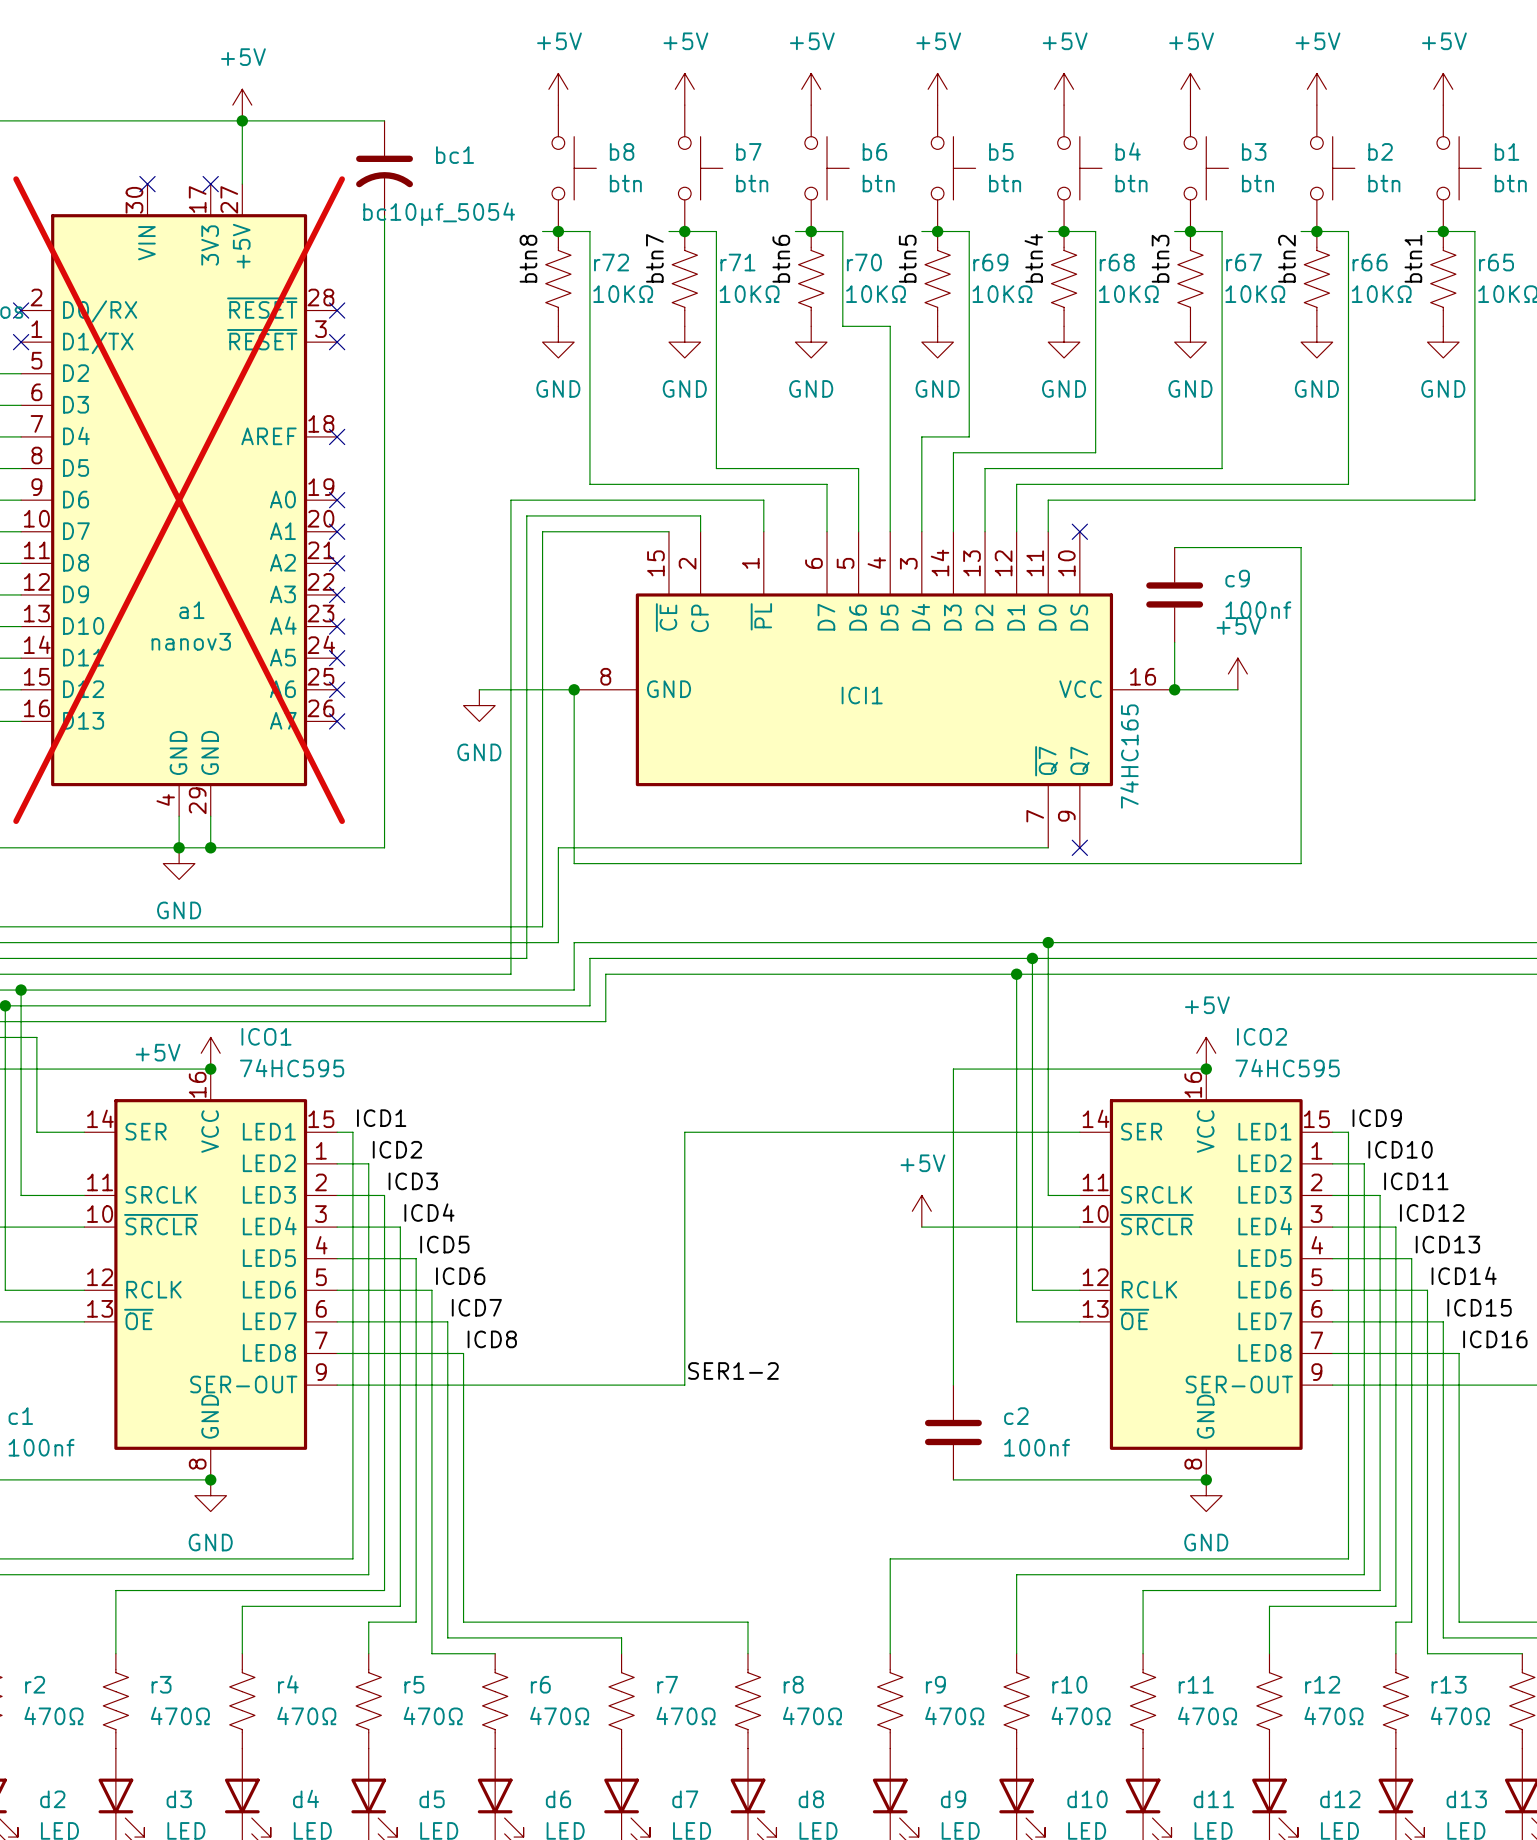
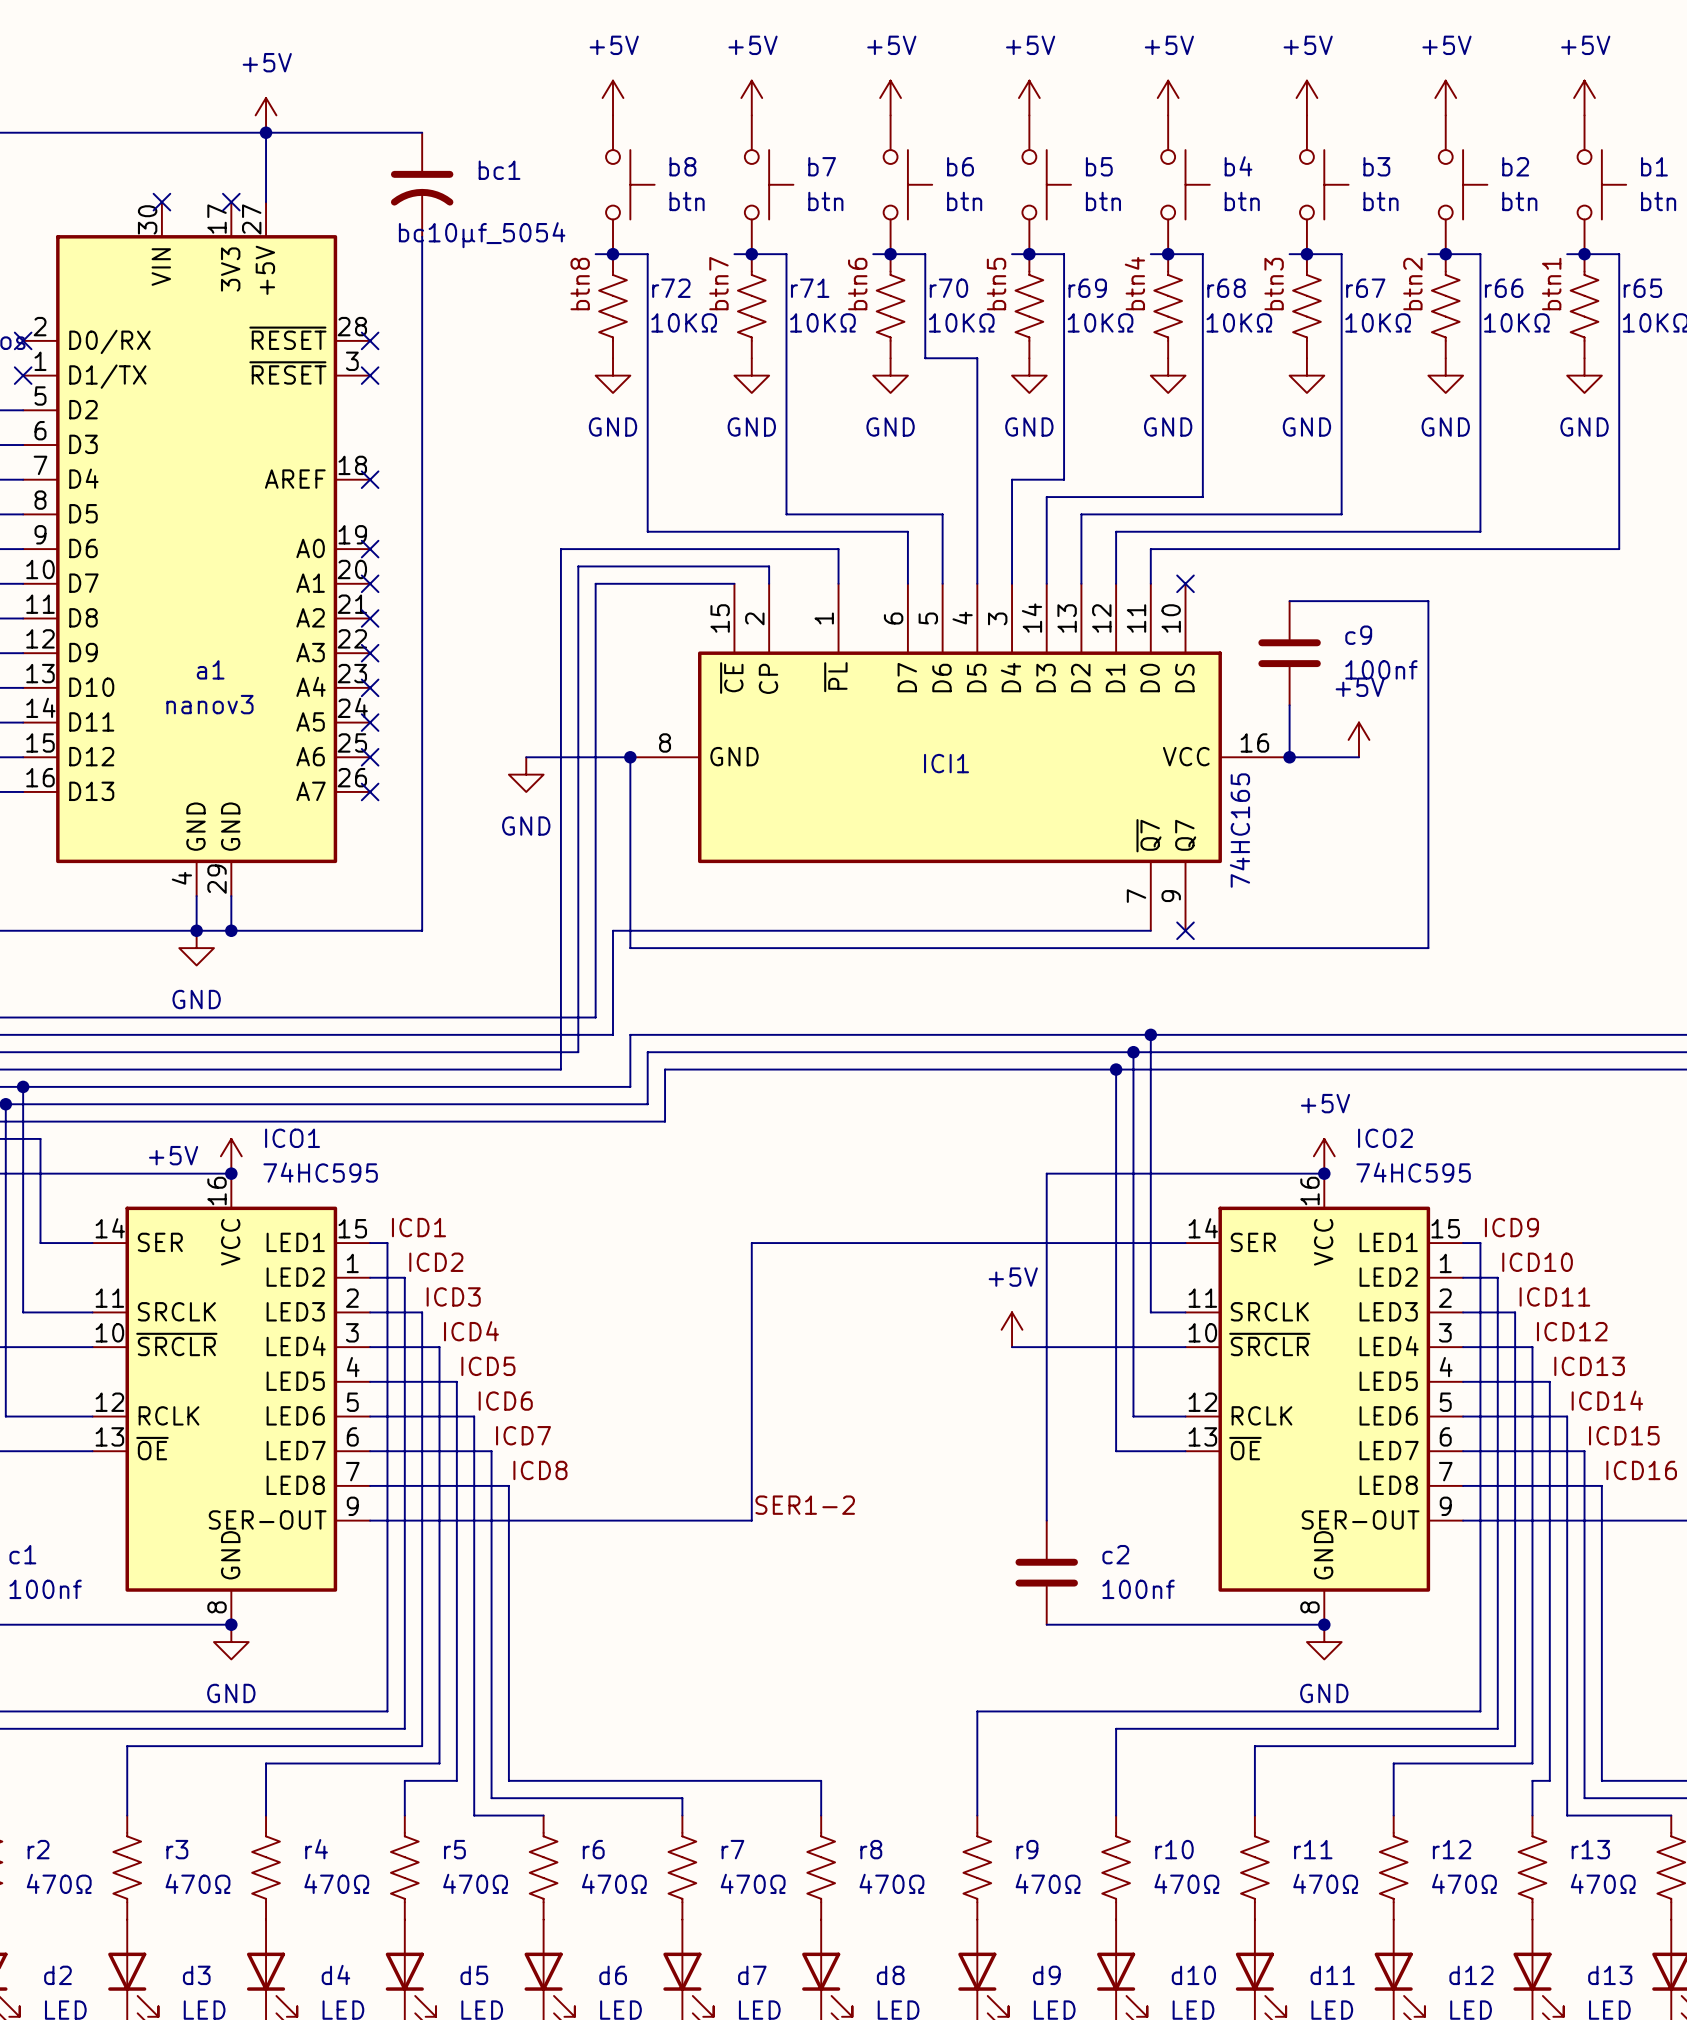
a1 do-not-place cross: (179, 500) -> none

